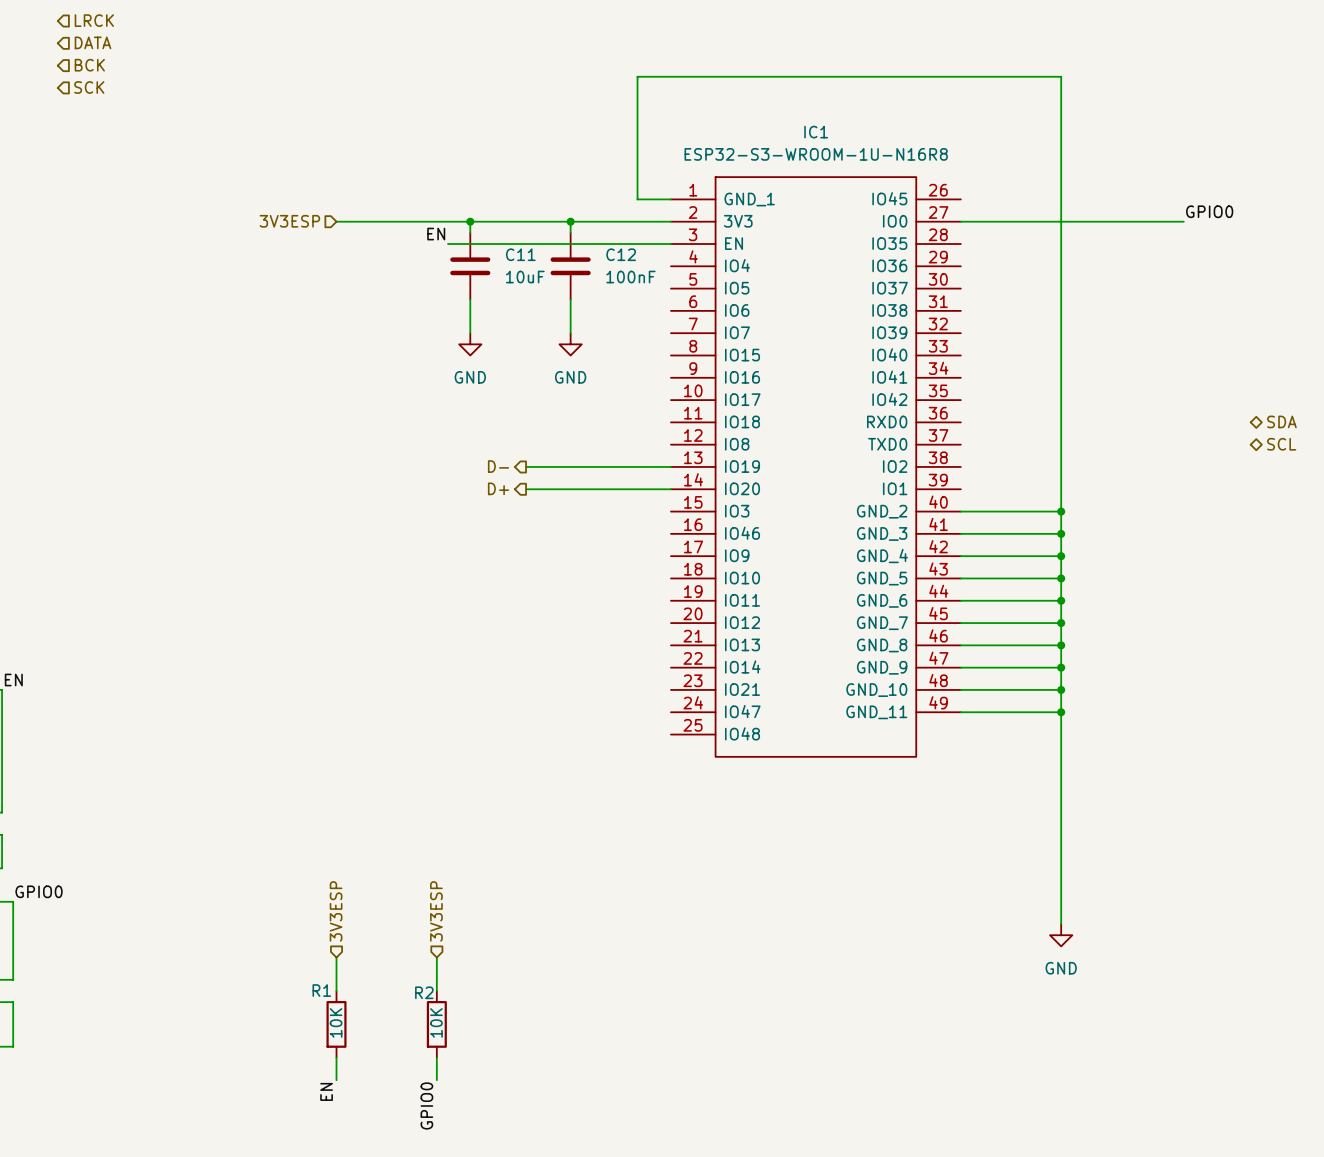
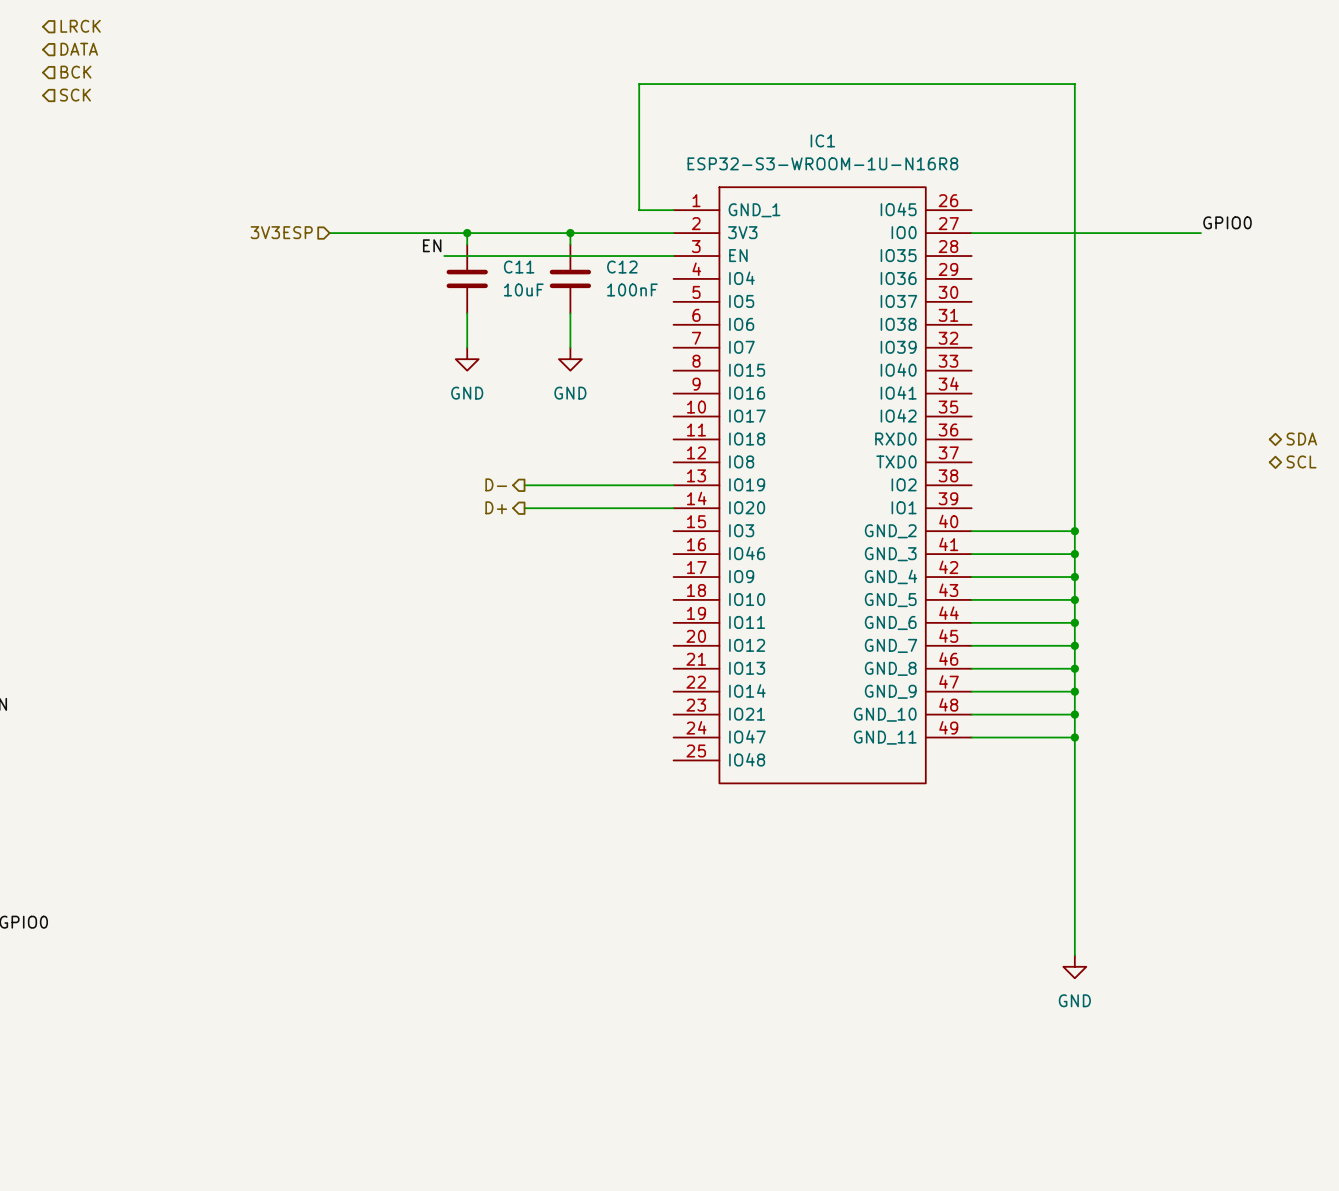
hierarchical label: 3V3ESP (336, 911) -> none
hierarchical label: 3V3ESP (436, 911) -> none
wire: (336, 957) (336, 990) -> none
wire: (436, 957) (436, 990) -> none
R1: 10K (336, 1024) -> none
R2: 10K (436, 1024) -> none
wire: (336, 1057) (336, 1080) -> none
wire: (436, 1057) (436, 1080) -> none
label: EN (326, 1091) -> none
label: GPIO0 (426, 1105) -> none

